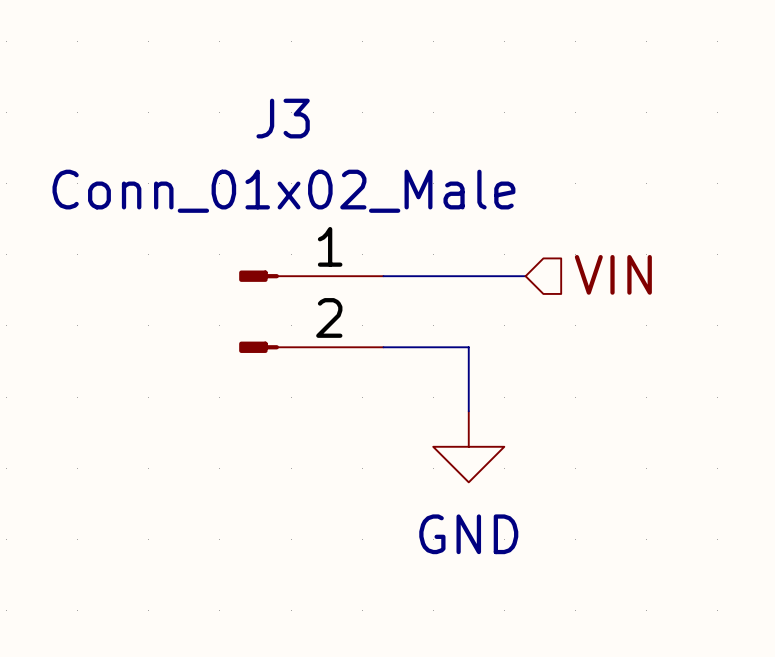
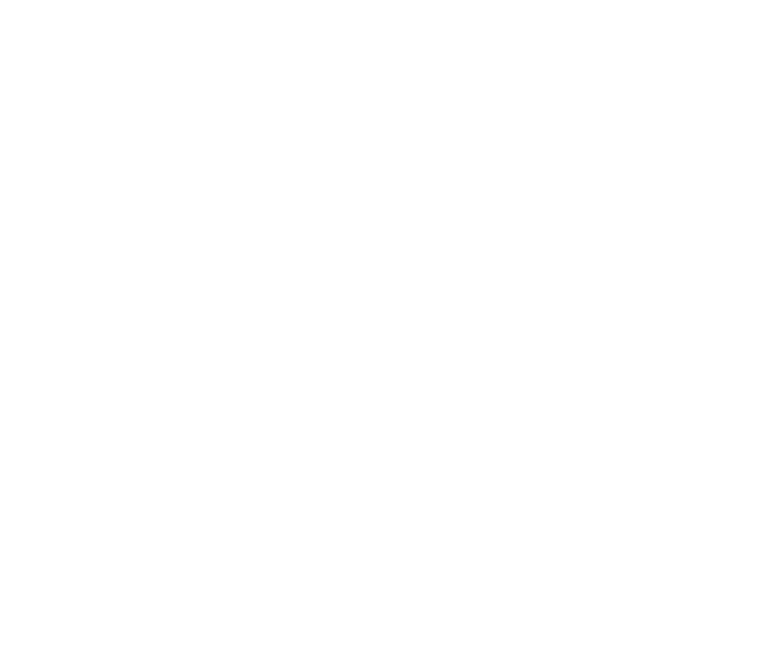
hierarchical label: VIN (613, 274) -> none
wire: (383, 276) (525, 276) -> none
J3: Conn_01x02_Male (311, 311) -> none
wire: (383, 347) (468, 347) (468, 411) -> none
power symbol: GND (468, 446) -> none

